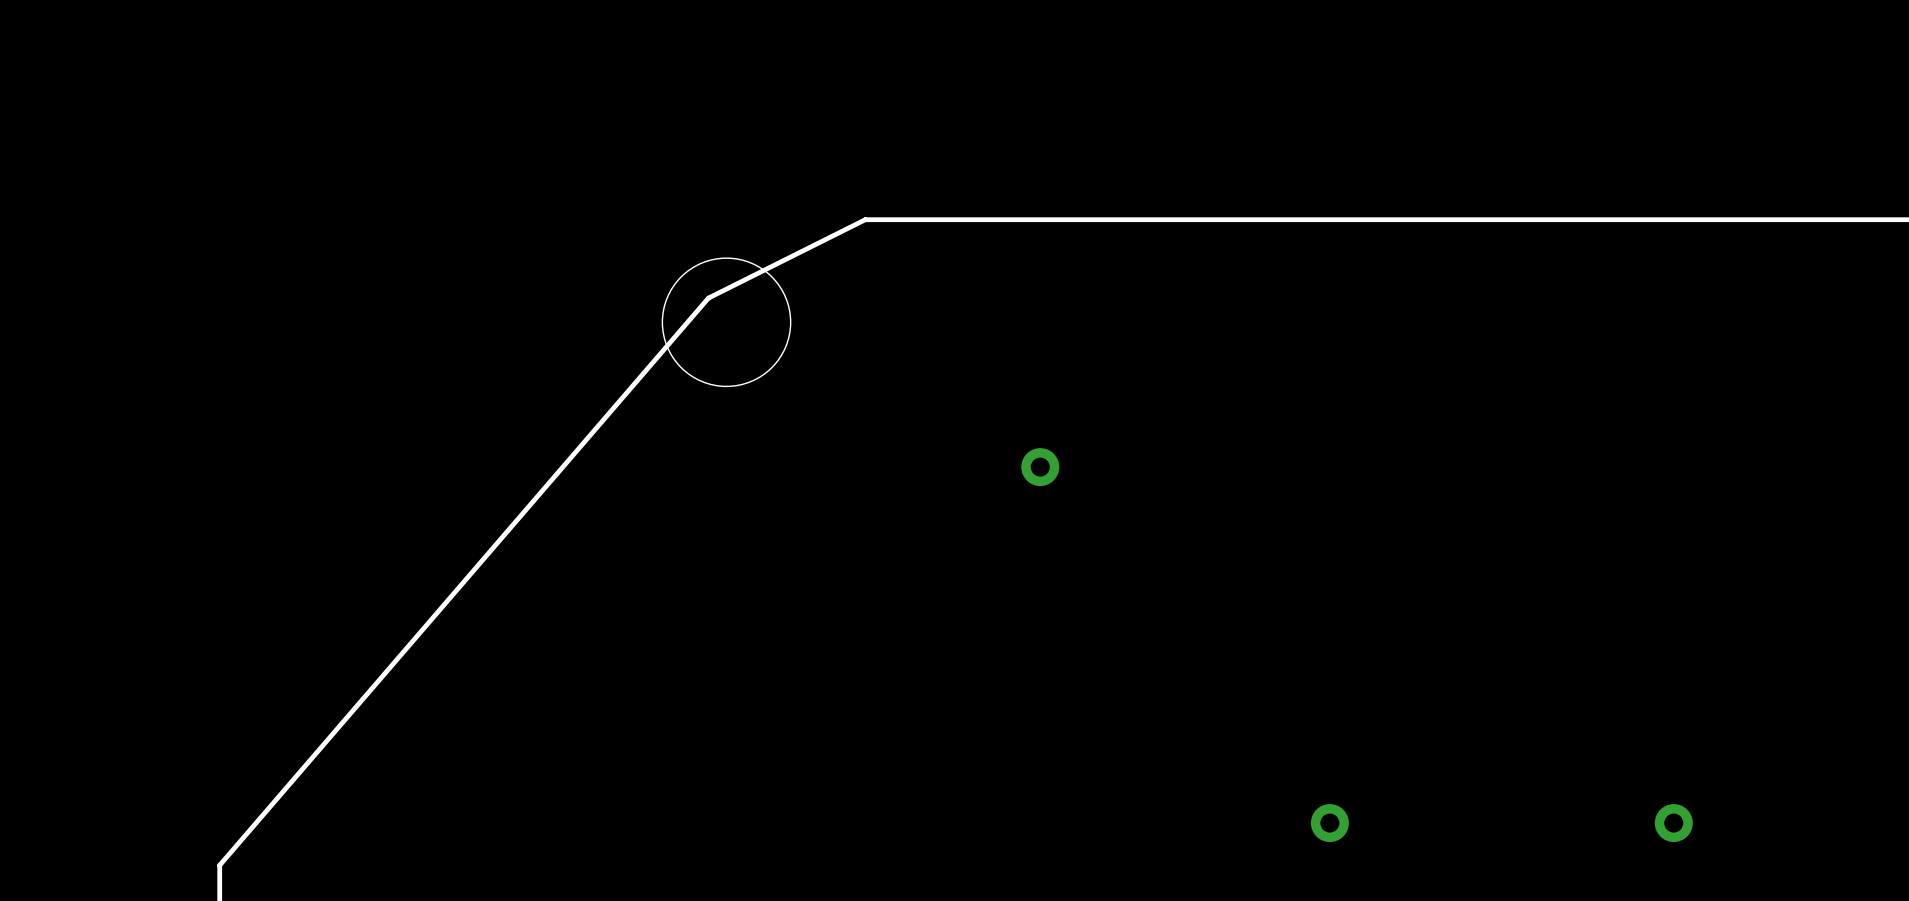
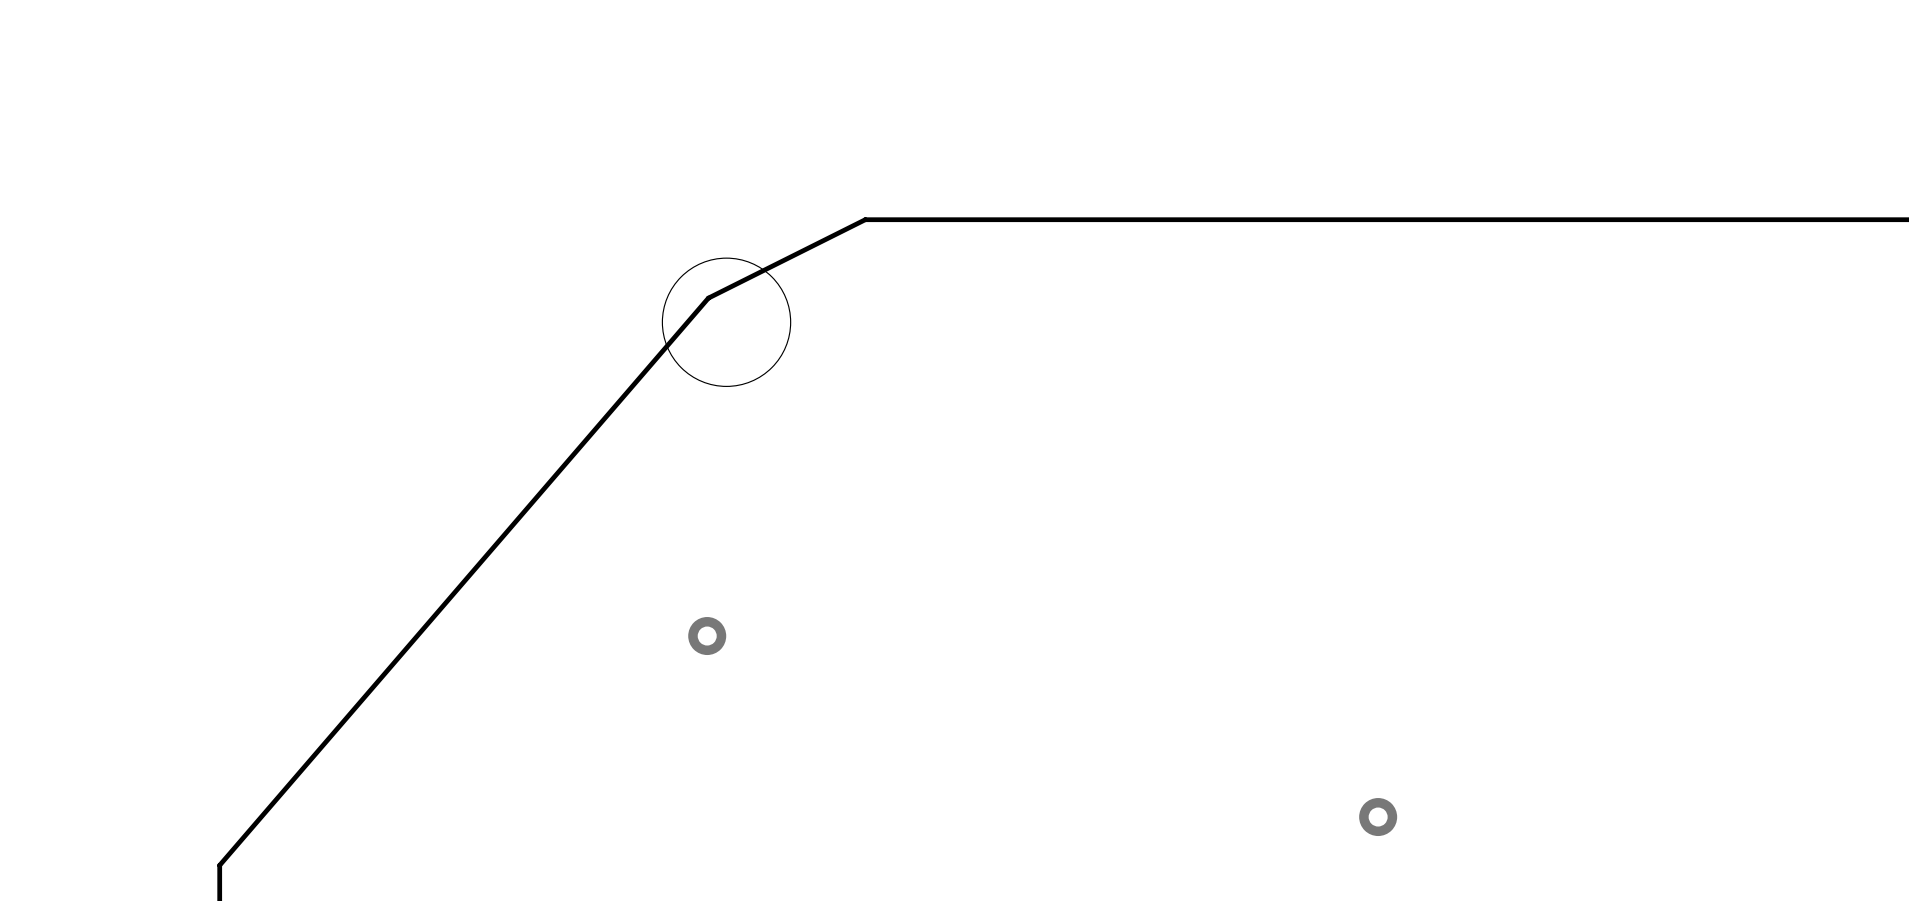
via: (1040, 467) -> none
via: none -> (707, 636)
via position: (1329, 823) -> (1378, 817)
via: (1673, 823) -> none

